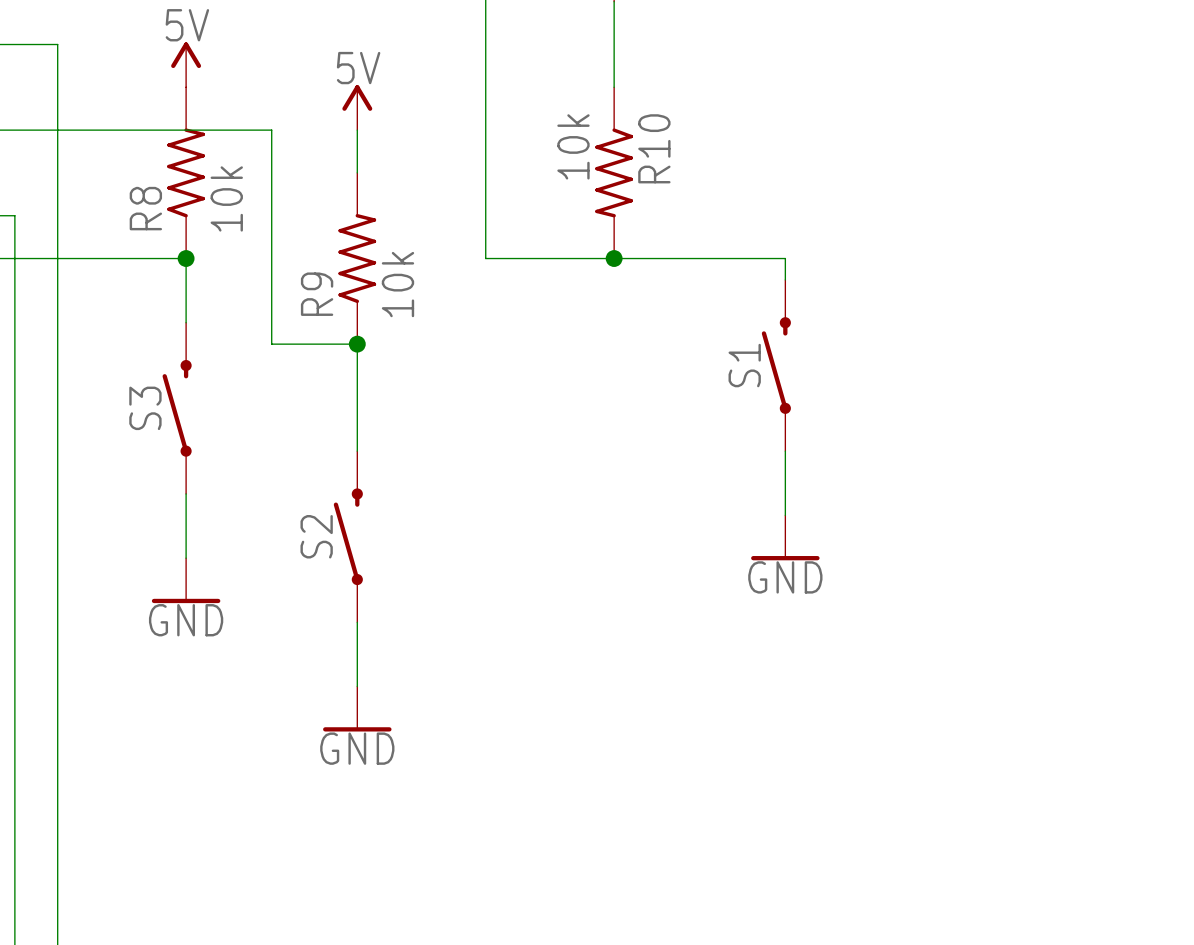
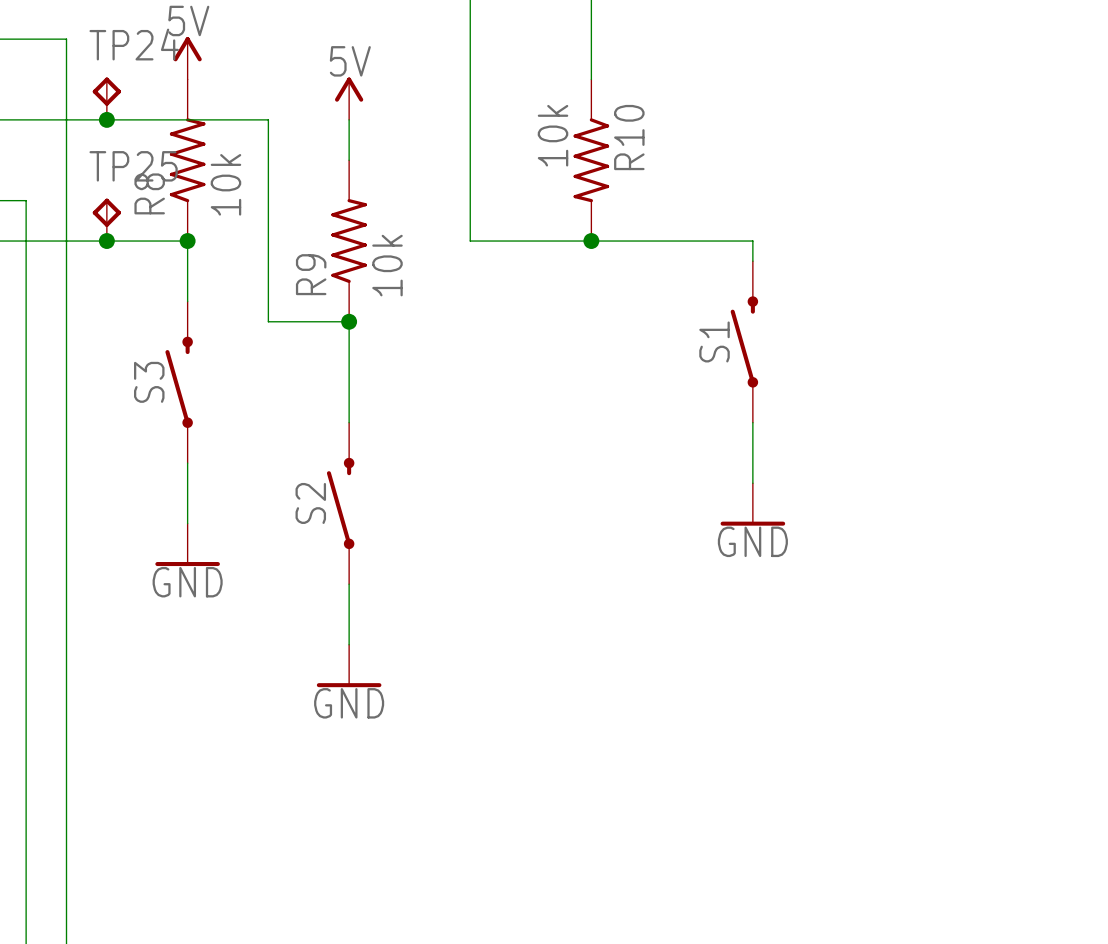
TP24: none -> (106, 98)
junction: none -> (106, 119)
TP25: none -> (106, 219)
junction: none -> (106, 241)

